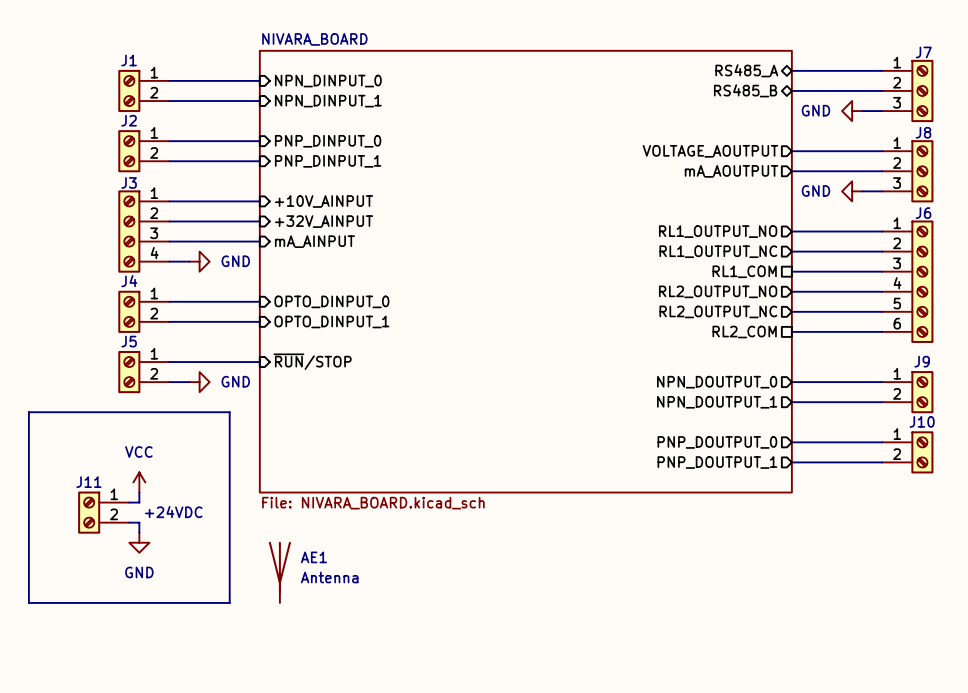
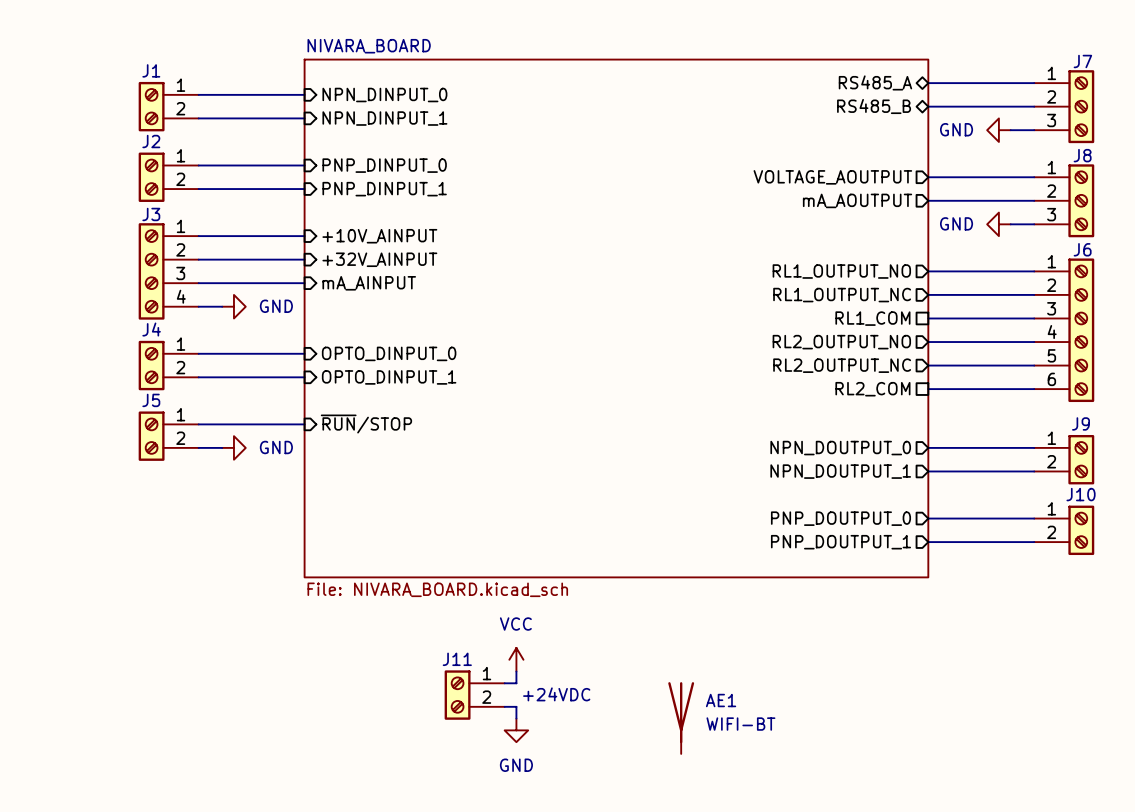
line: (28, 412) (229, 412) (229, 602) (28, 602) (28, 412) -> none
power symbol: VCC (139, 482) -> none
wire: (139, 492) (139, 502) (129, 502) -> none
J11 position: (103, 512) -> (474, 695)
text: +24VDC (173, 512) -> none
wire: (129, 522) (139, 522) (139, 532) -> none
power symbol: GND (139, 542) -> none
power symbol: none -> VCC (516, 659)
AE1 position: (279, 572) -> (681, 718)
wire: none -> (516, 671) (516, 683) (504, 683)
AE1 value: Antenna (329, 577) -> WIFI-BT (740, 724)
text: none -> +24VDC (556, 694)
wire: none -> (504, 706) (516, 706) (516, 718)
power symbol: none -> GND (516, 730)

